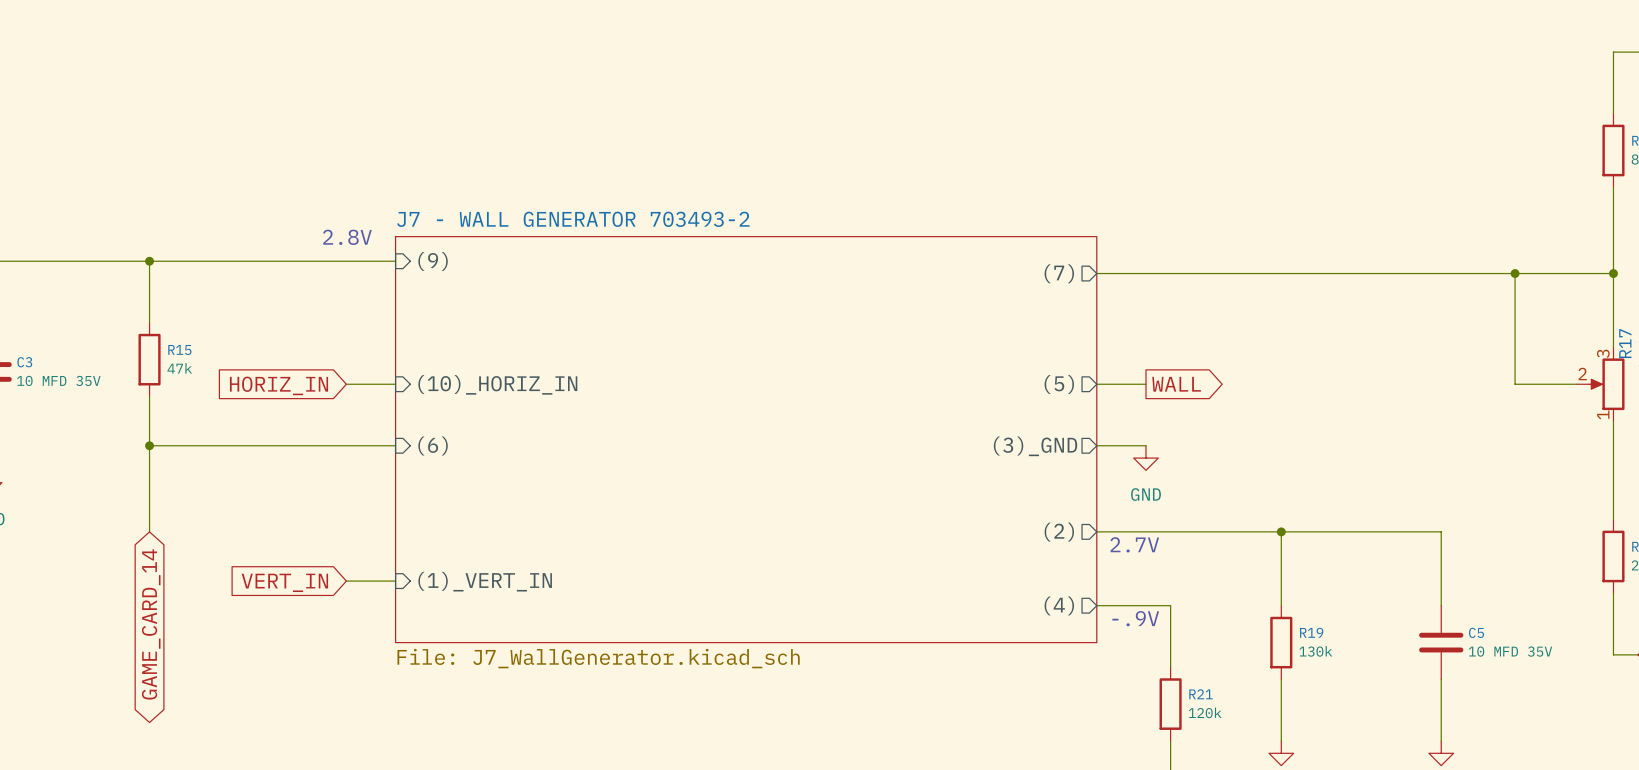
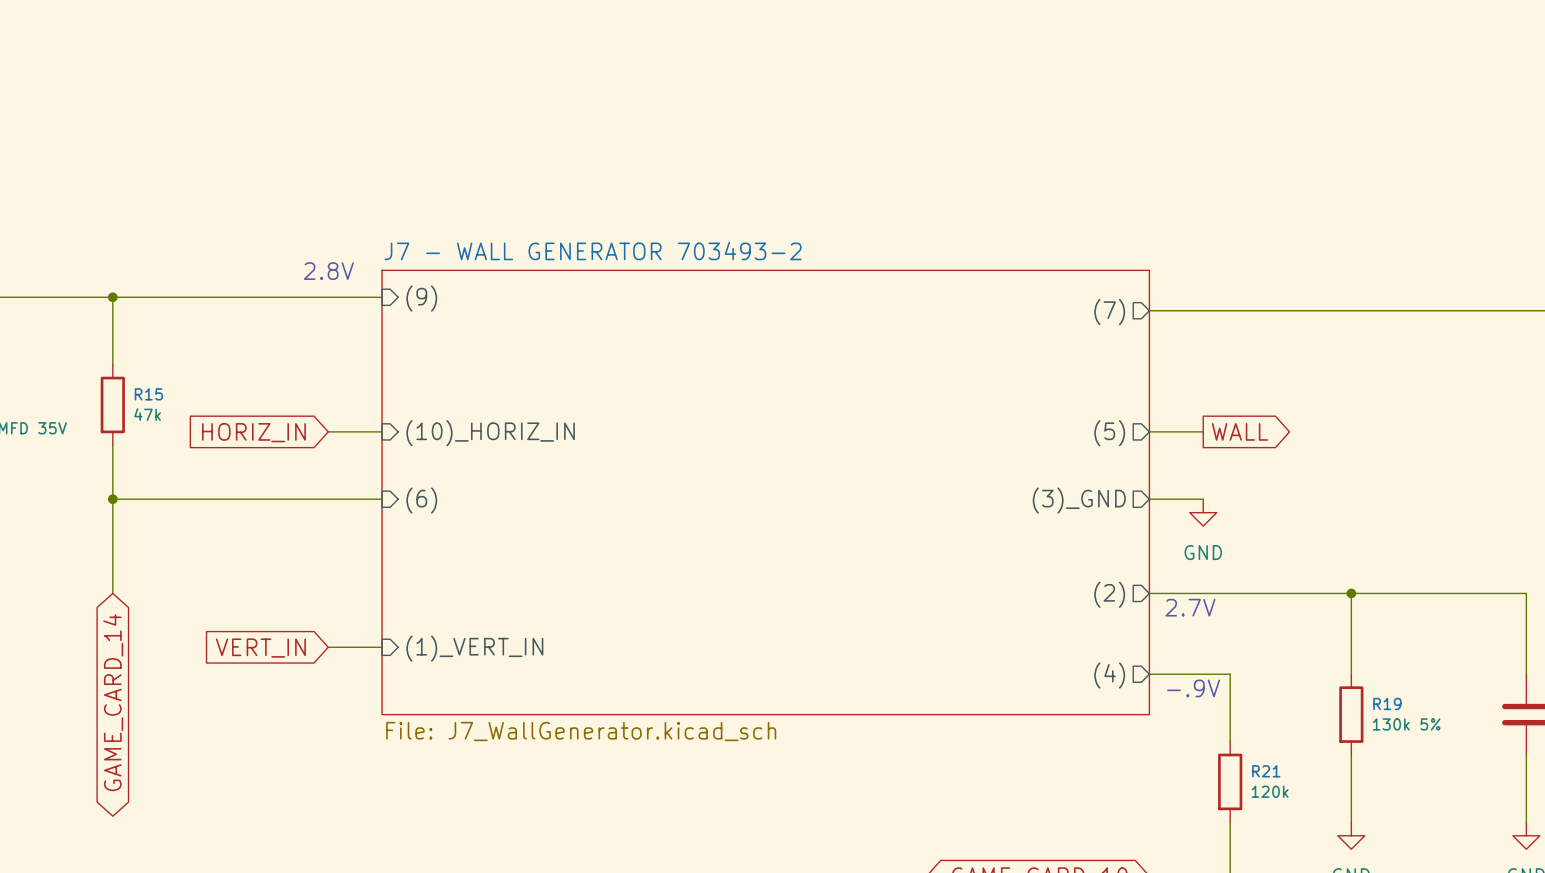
R19 value: 130k (1315, 651) -> 130k 5% (1406, 724)

